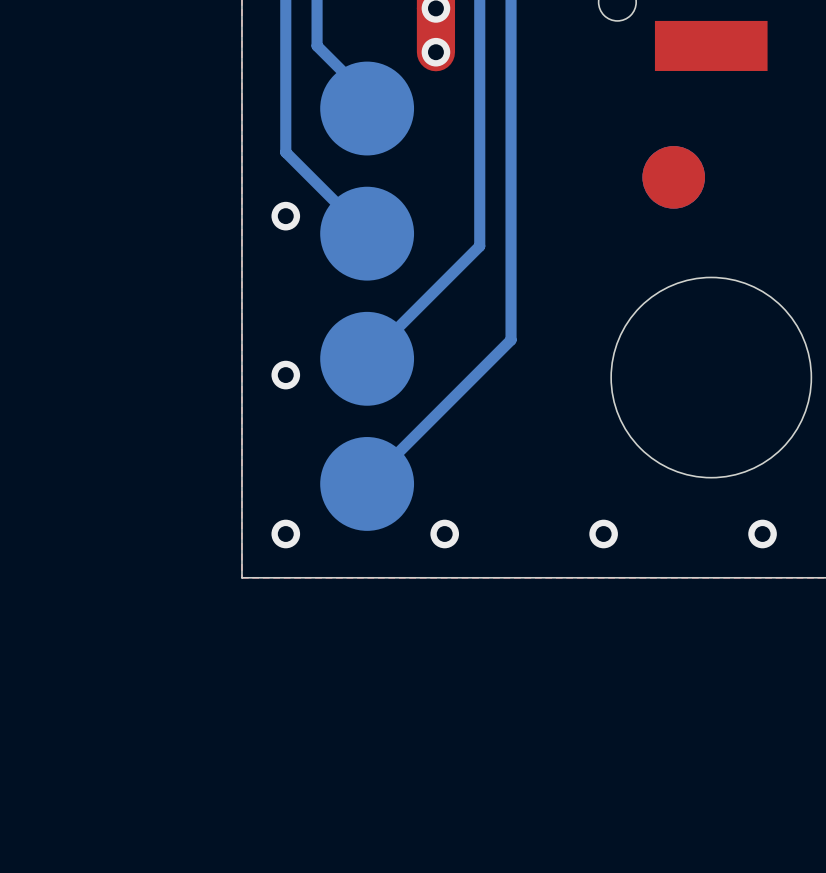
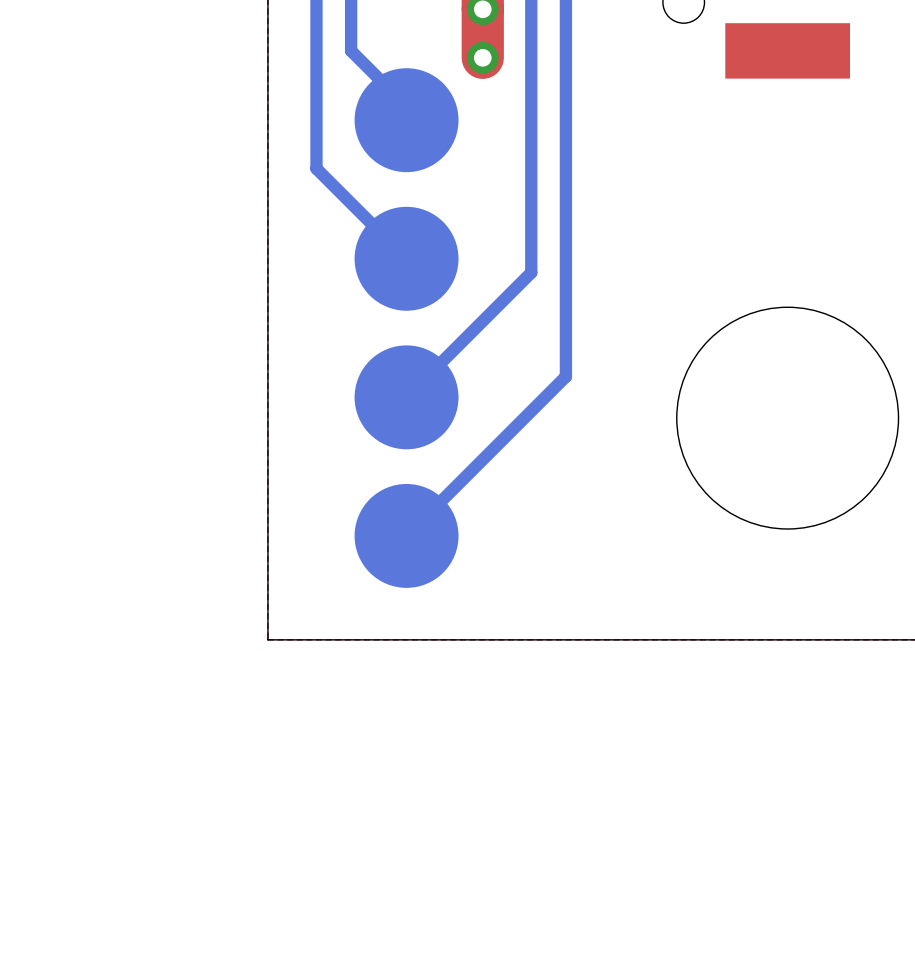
part: (673, 177) -> none
via: (285, 216) -> none
via: (285, 375) -> none
via: (285, 534) -> none
via: (444, 534) -> none
via: (603, 534) -> none
via: (762, 534) -> none

